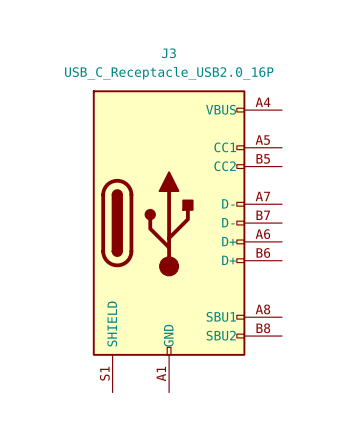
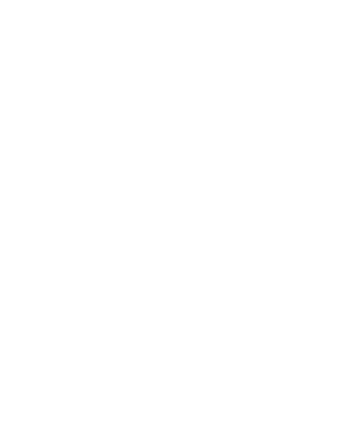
J3: USB_C_Receptacle_USB2.0_16P (187, 241) -> none

